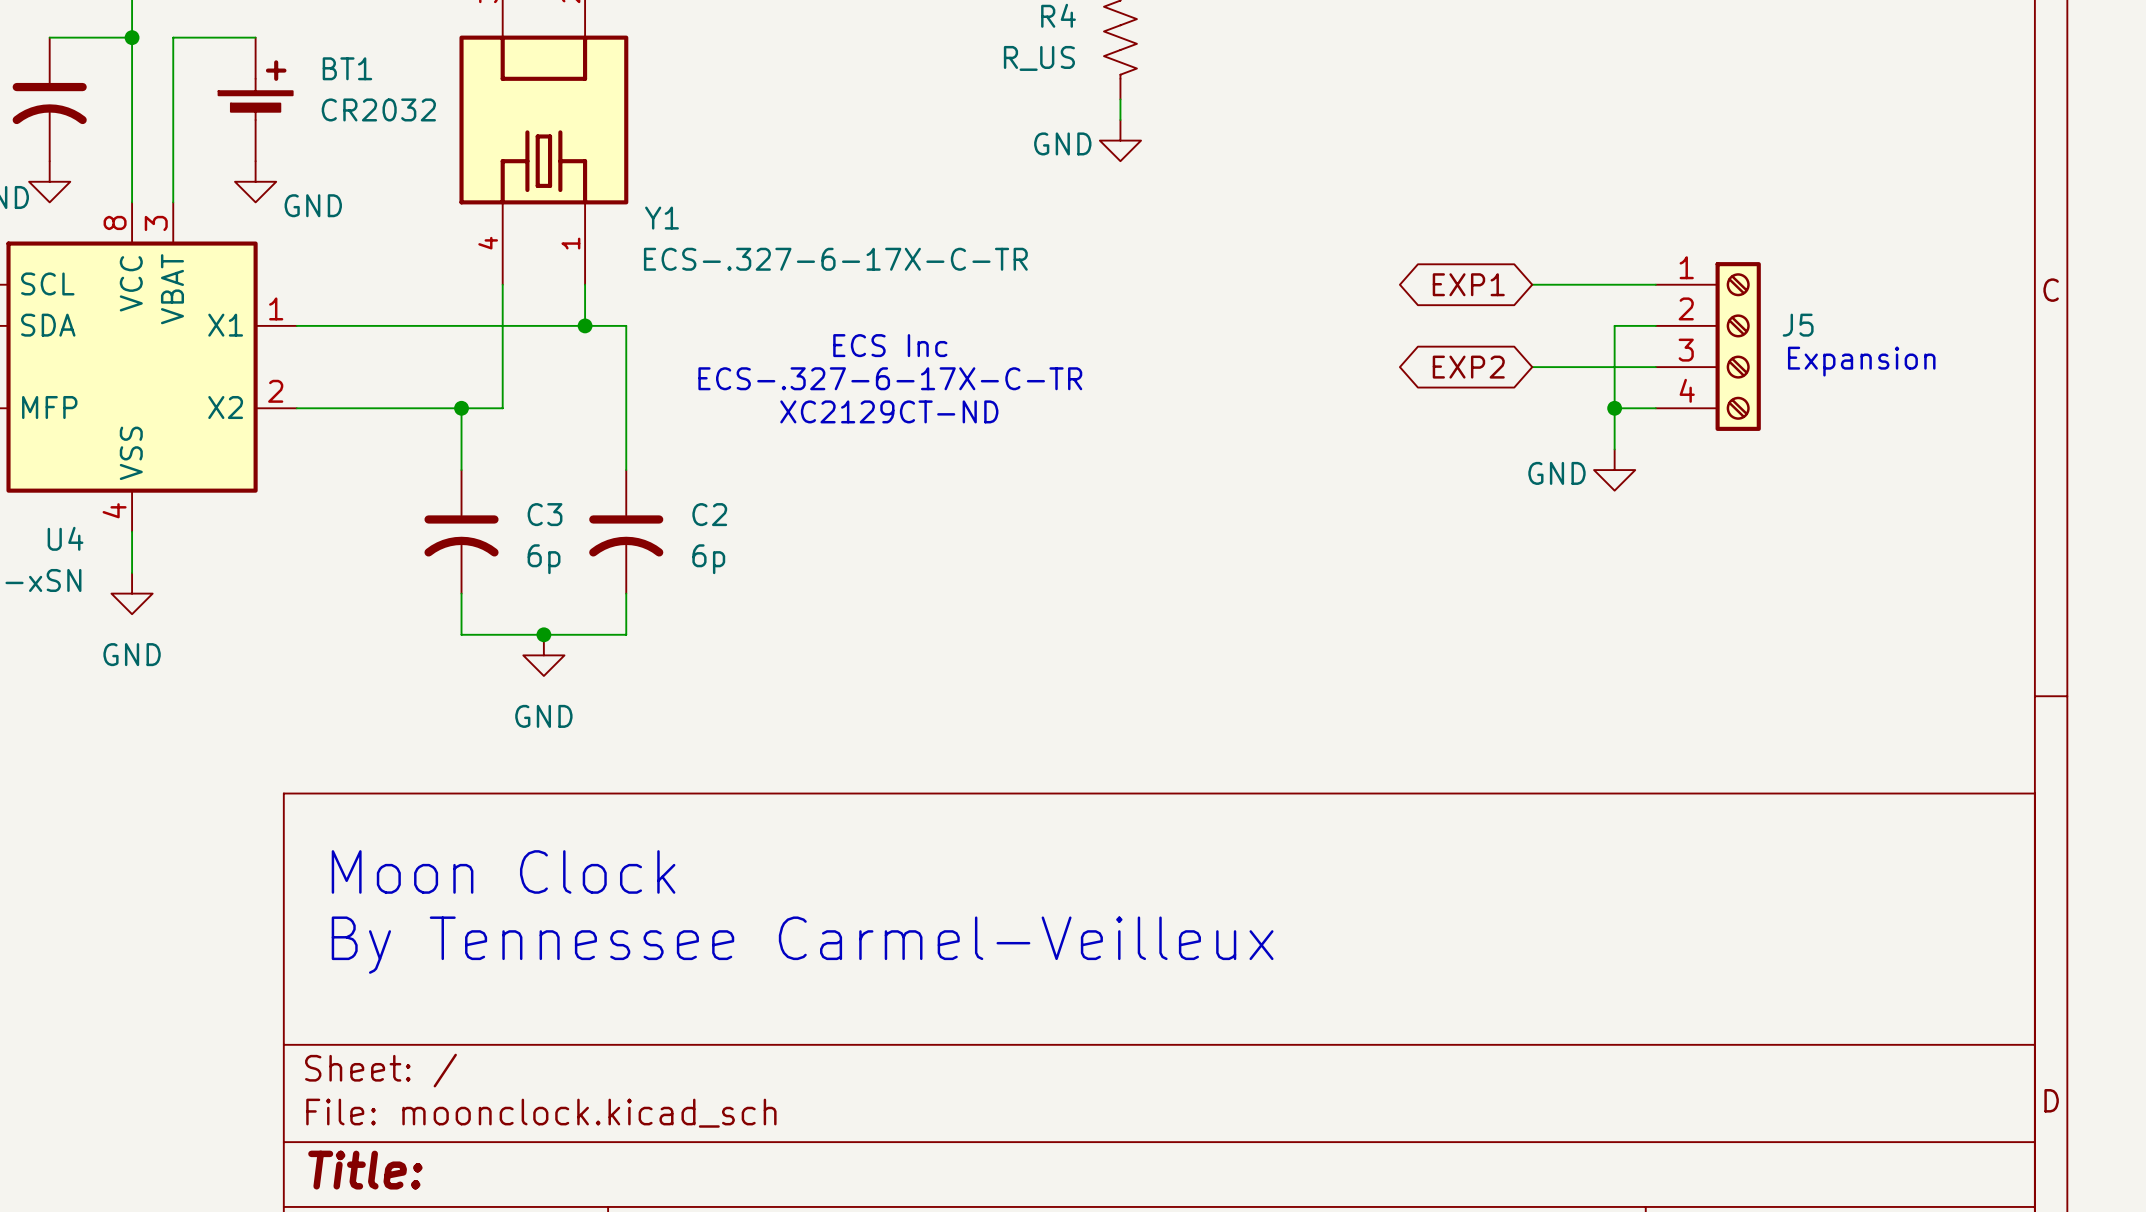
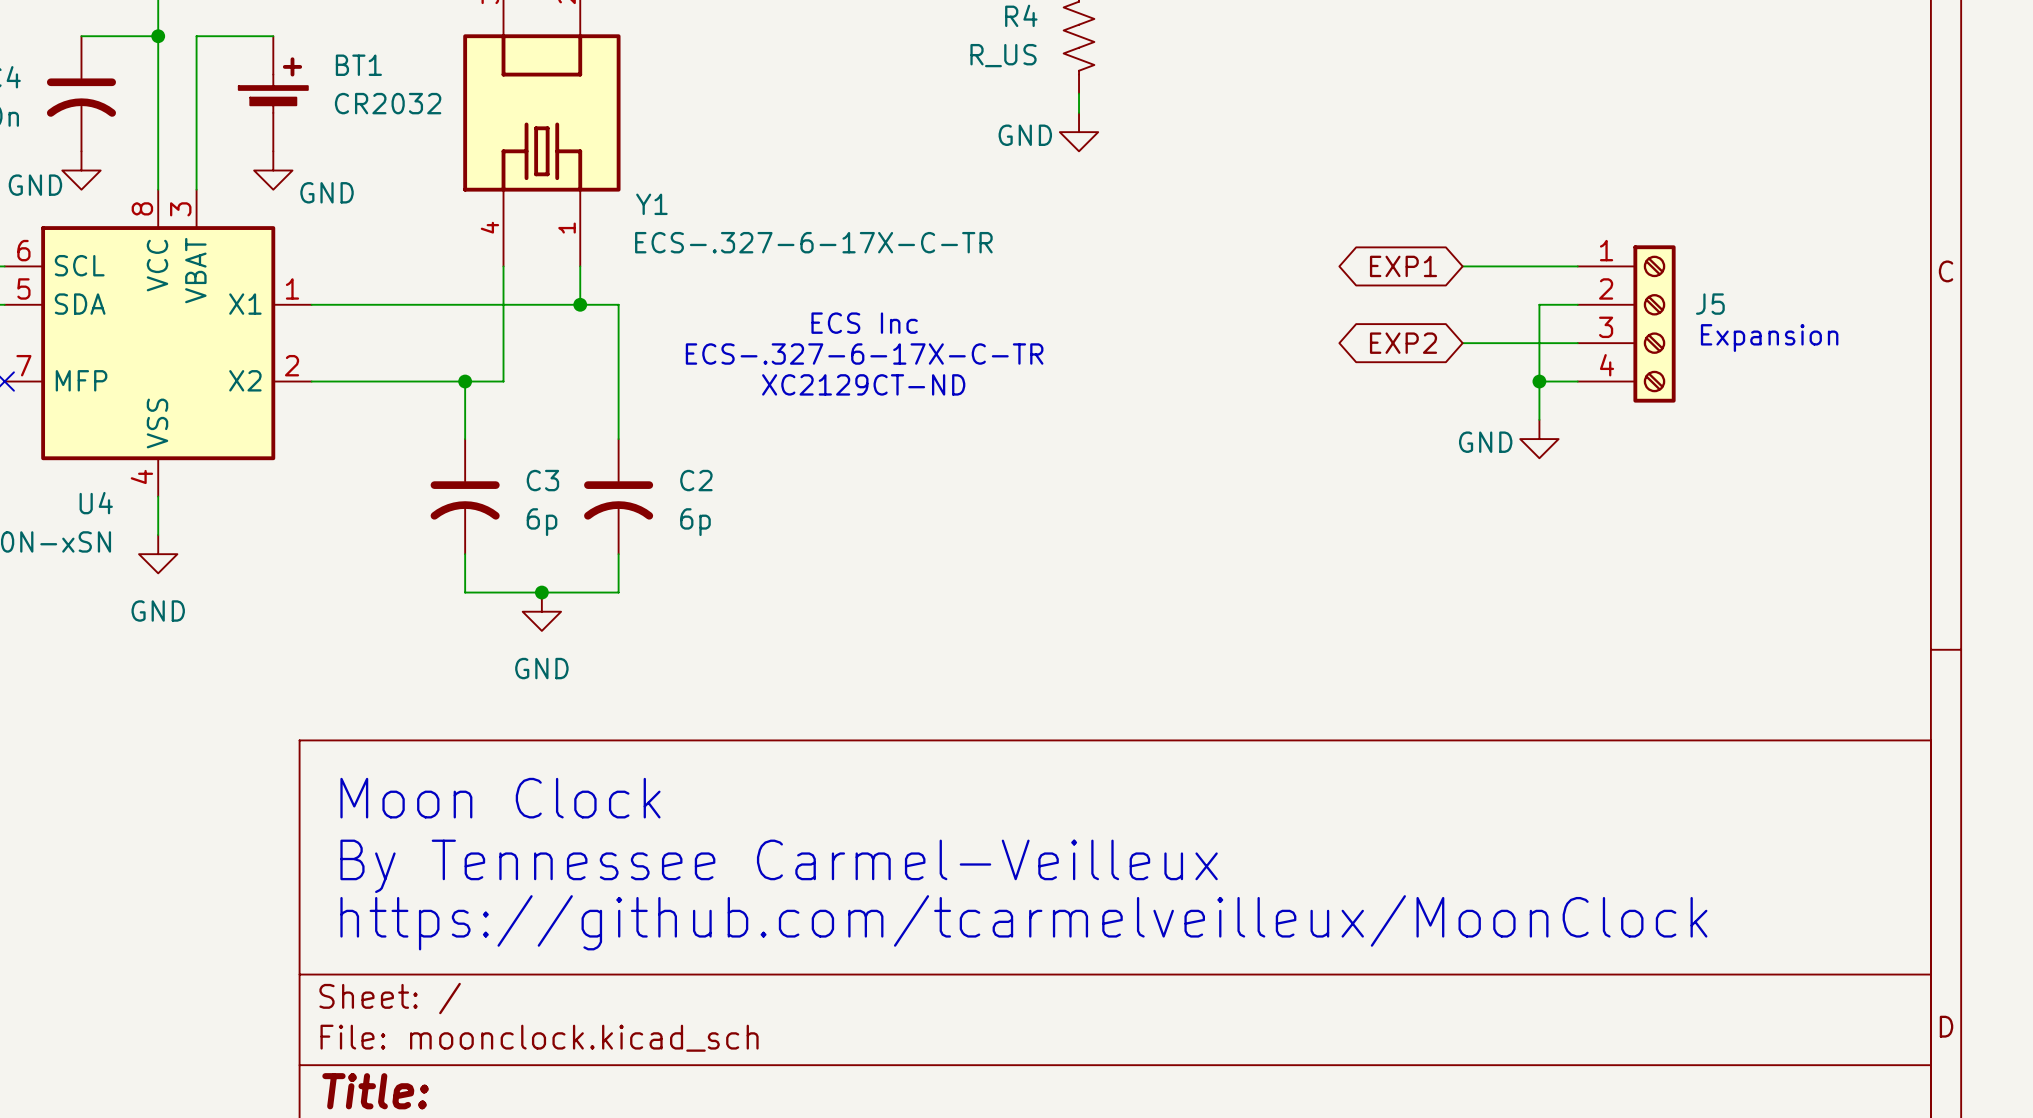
text position: Moon Clock (503, 871) -> Moon Clock (500, 798)
text position: By Tennessee Carmel-Veilleux (802, 945) -> By Tennessee Carmel-Veilleux (779, 866)
text: none -> https://github.com/tcarmelveilleux/MoonClock (1023, 922)

